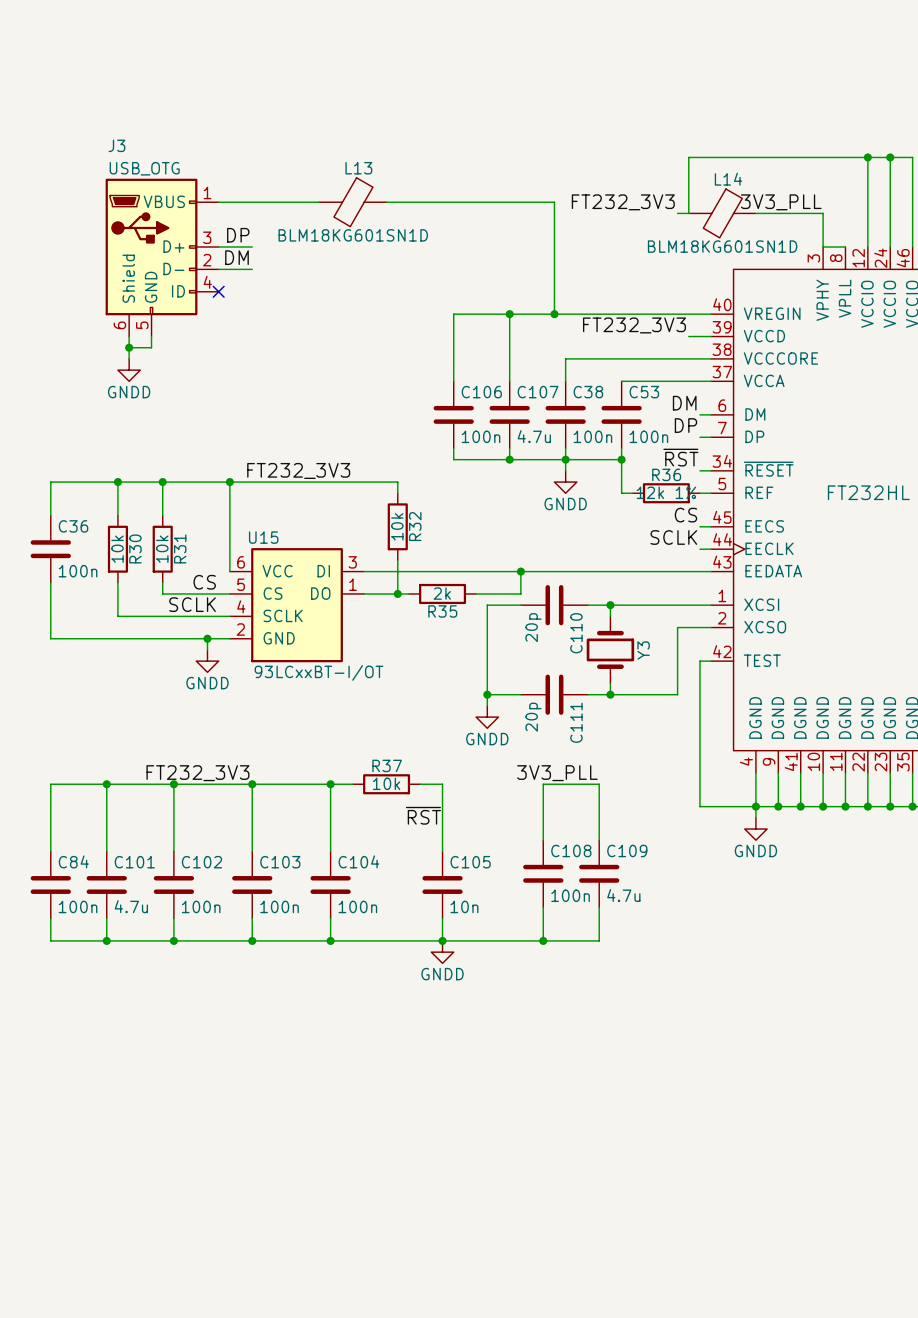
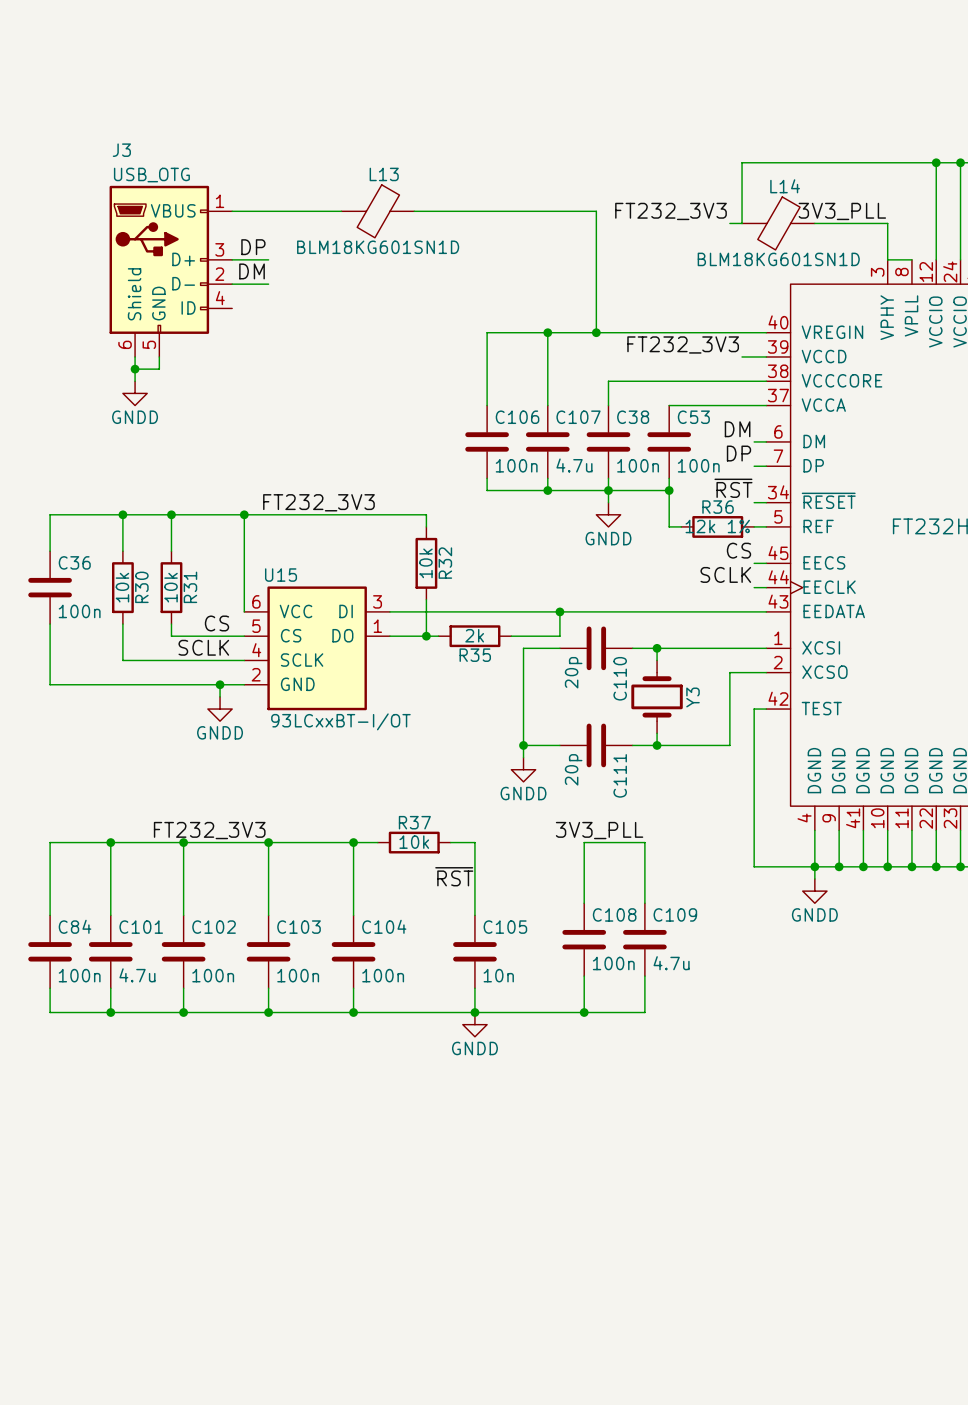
no-connect mark: (218, 291) -> none

